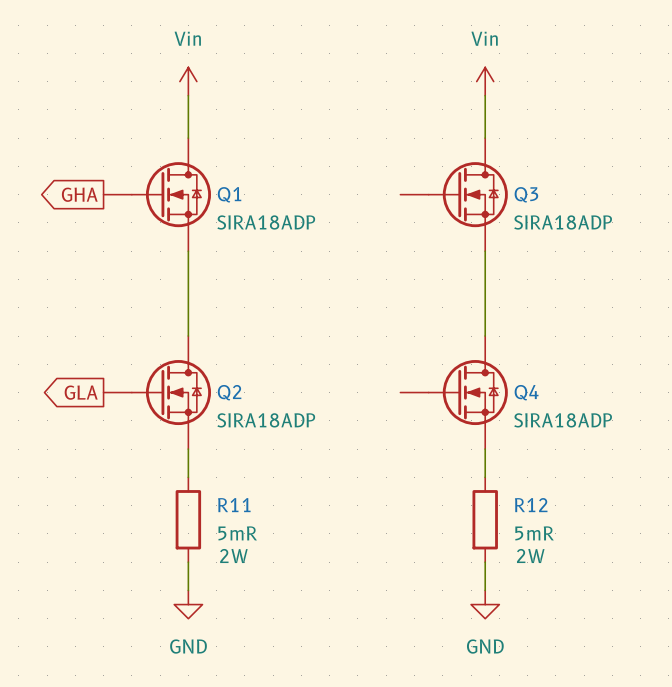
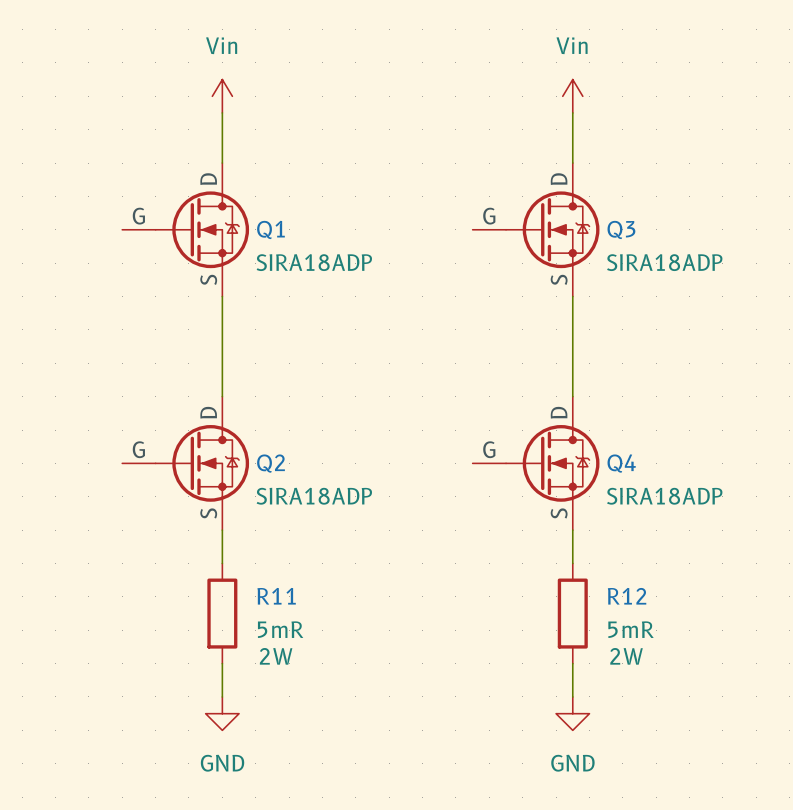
Q1 symbol: [103, 138, 211, 252] -> [122, 163, 250, 297]
Q3 symbol: [400, 138, 508, 252] -> [472, 163, 600, 297]
global label: GHA (79, 194) -> none
Q2 symbol: [103, 336, 211, 450] -> [122, 396, 250, 531]
Q4 symbol: [400, 336, 508, 450] -> [472, 396, 600, 531]
global label: GLA (81, 392) -> none

